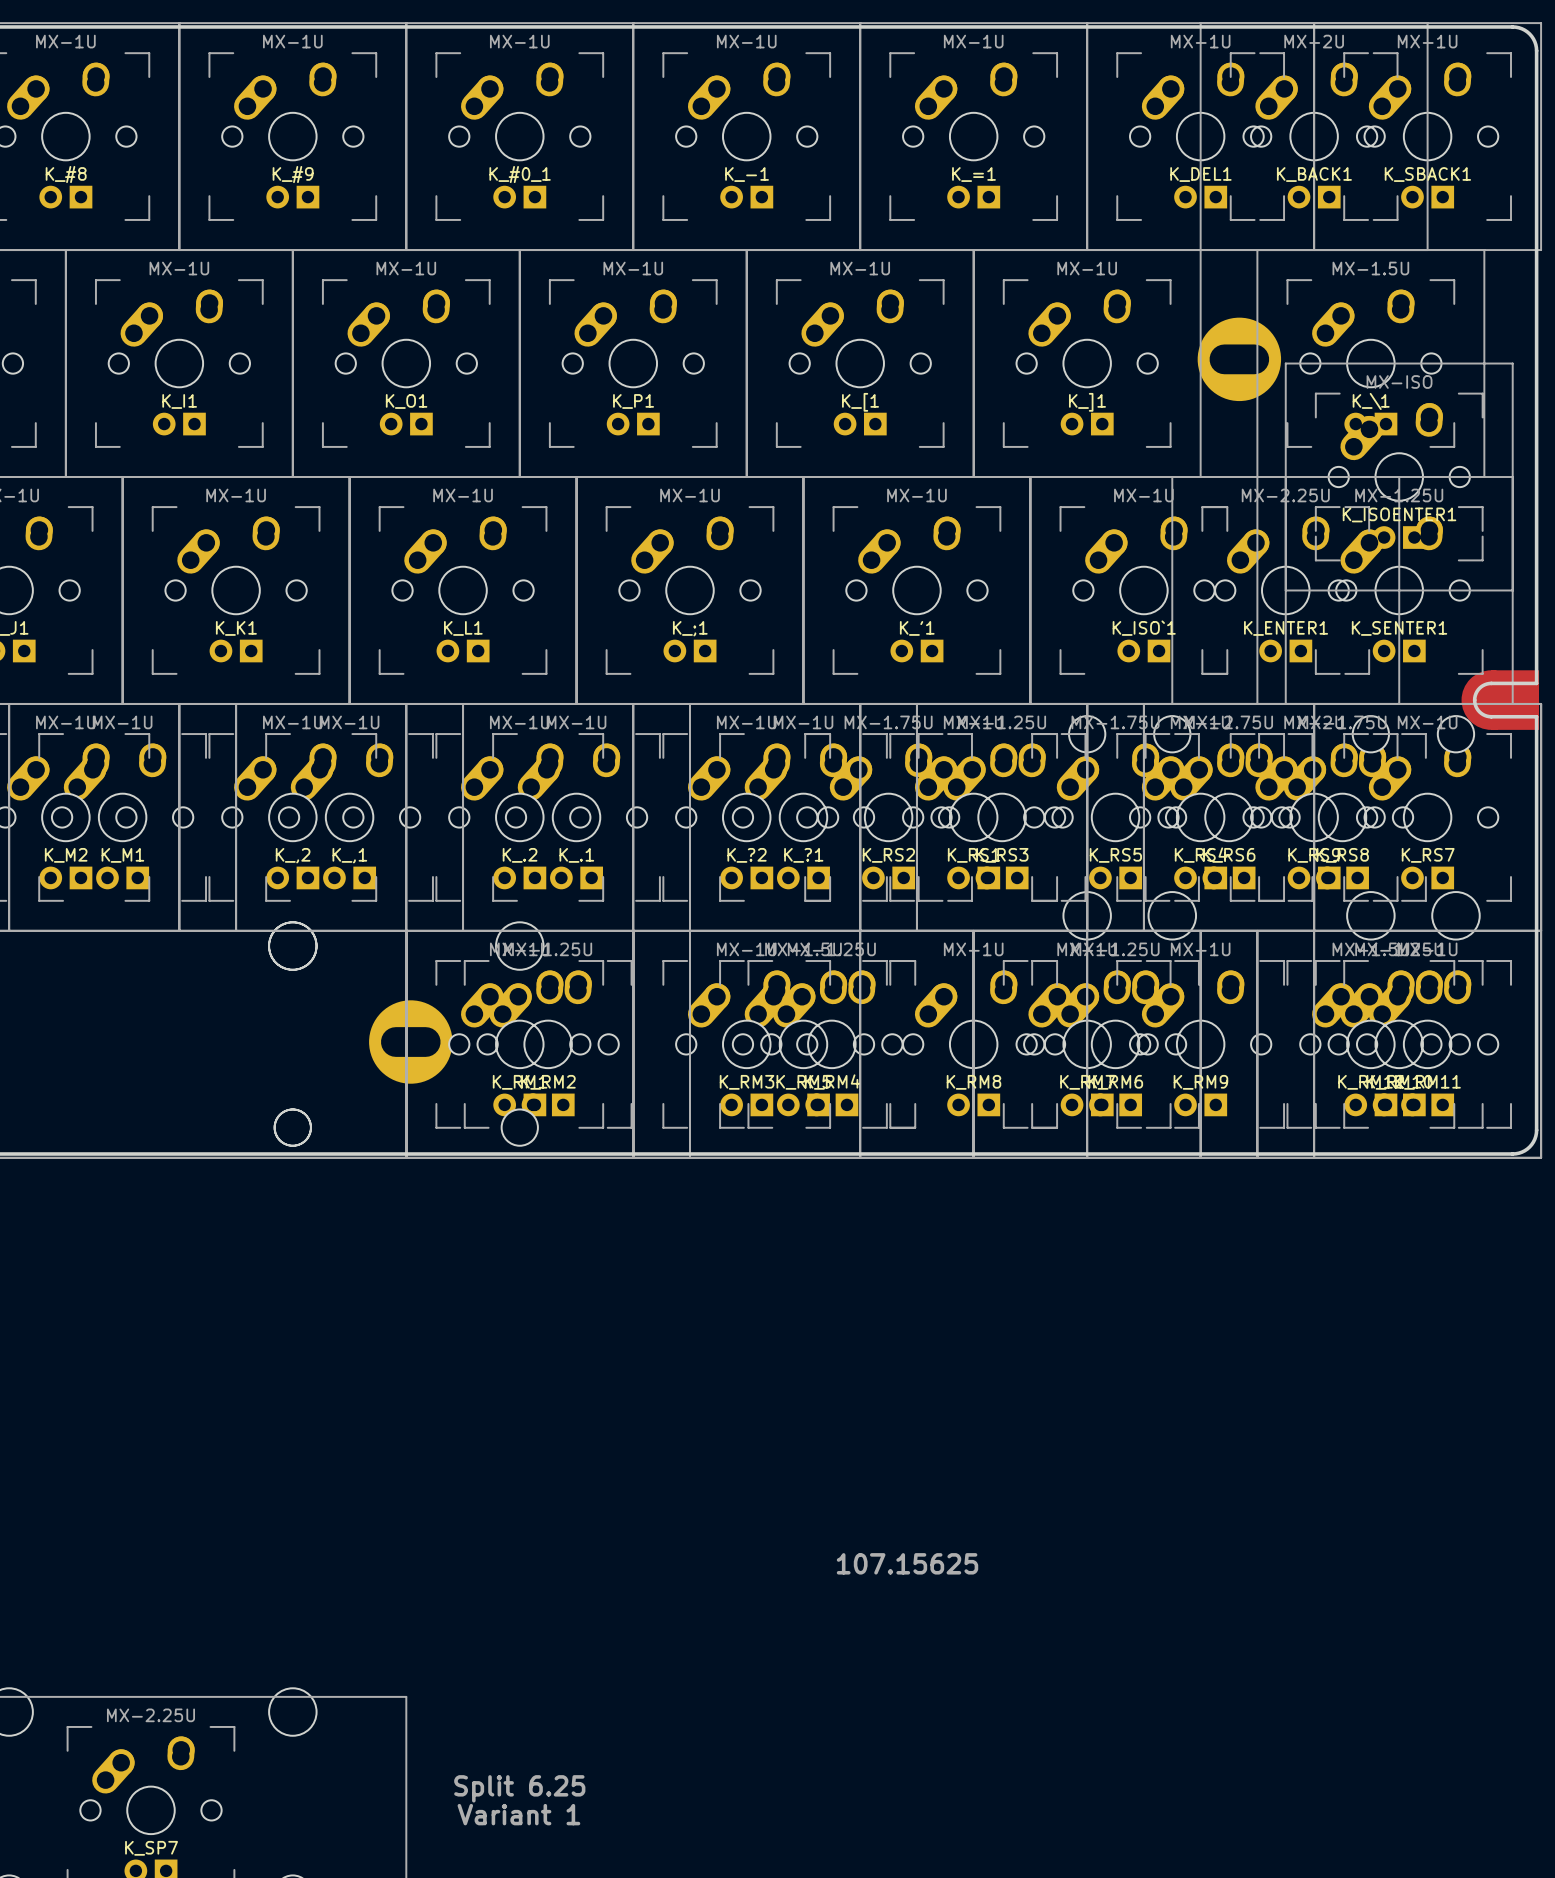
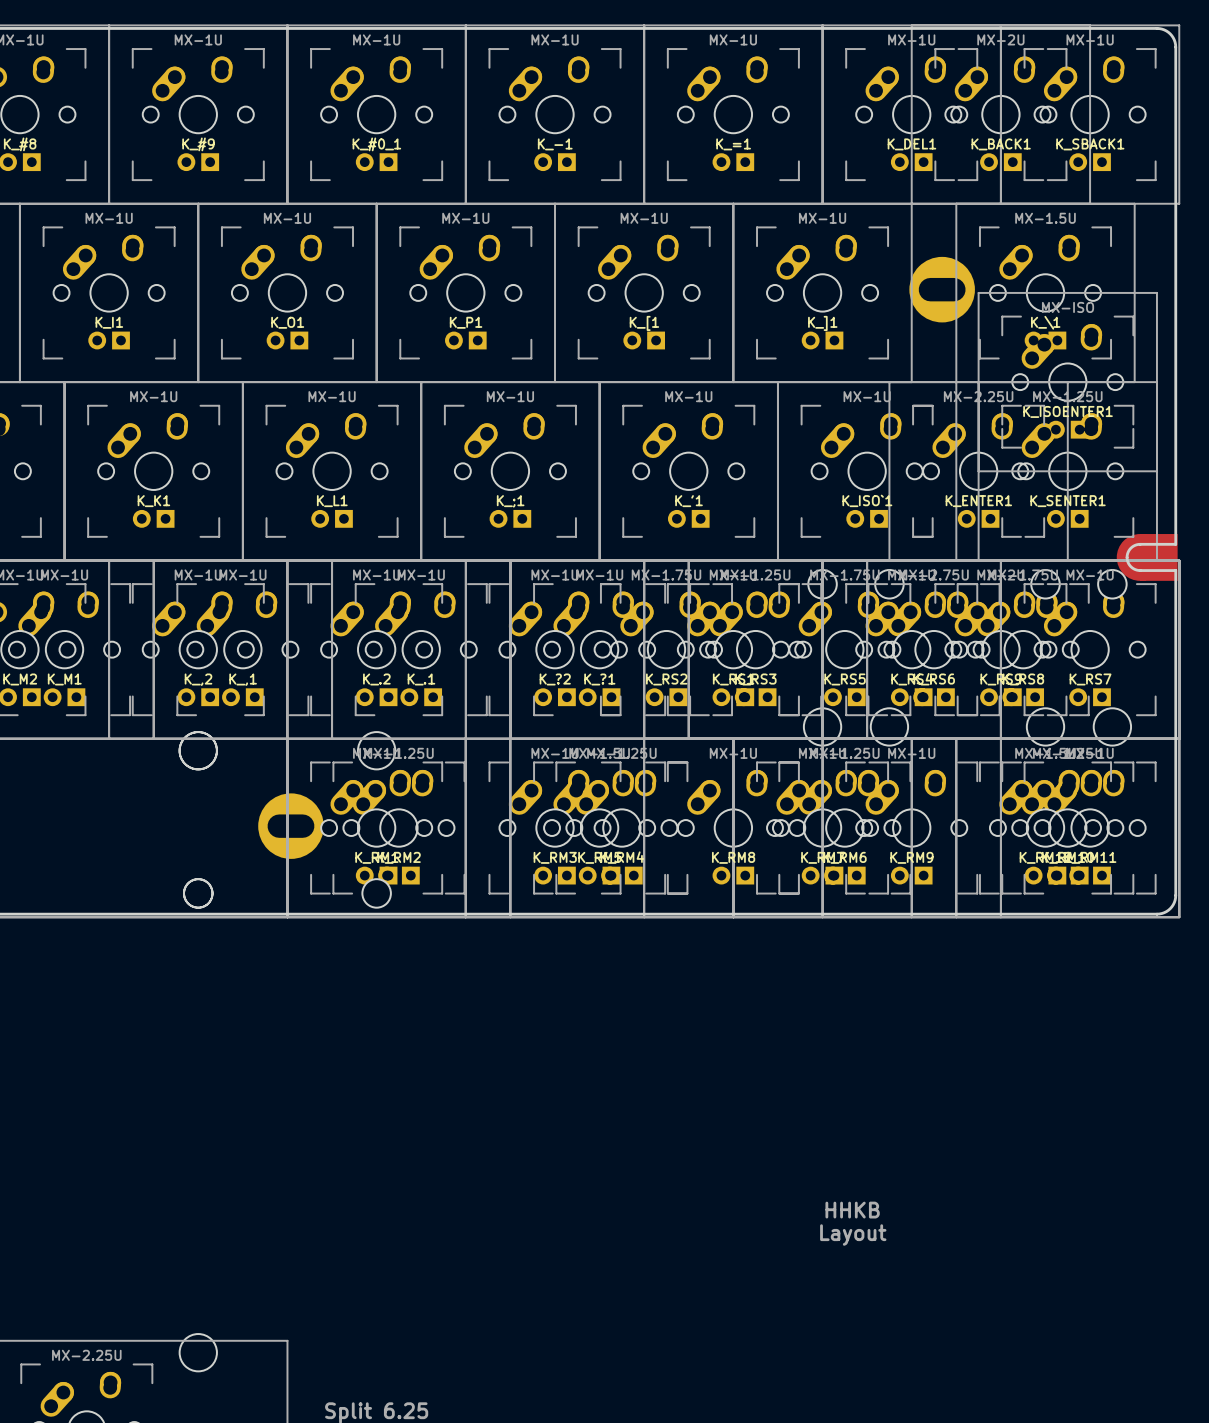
text: none -> HHKB (852, 1210)
text: none -> Layout (853, 1235)
text: 107.15625 (907, 1563) -> none

